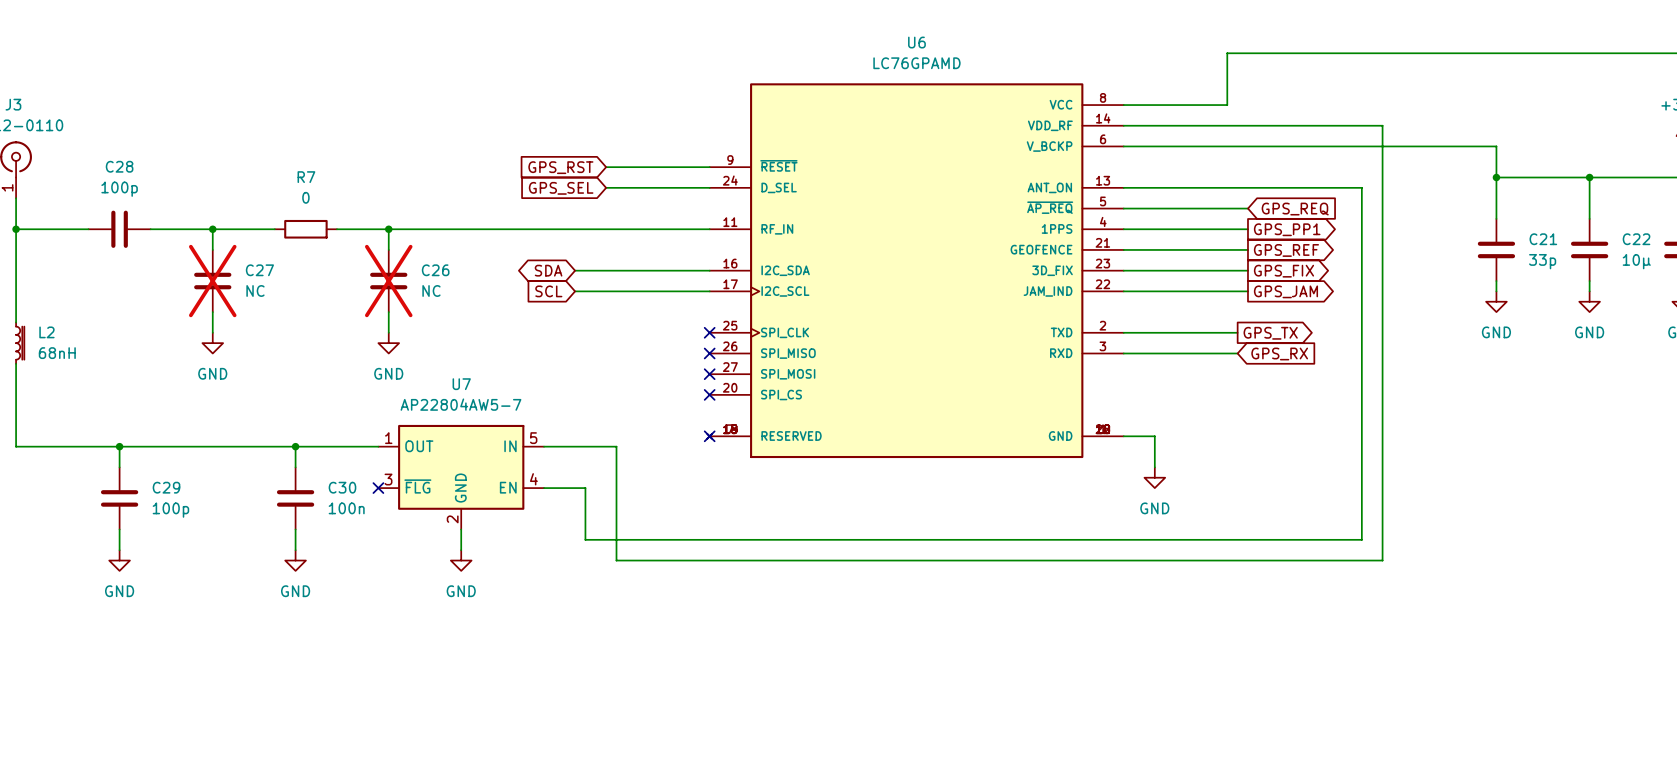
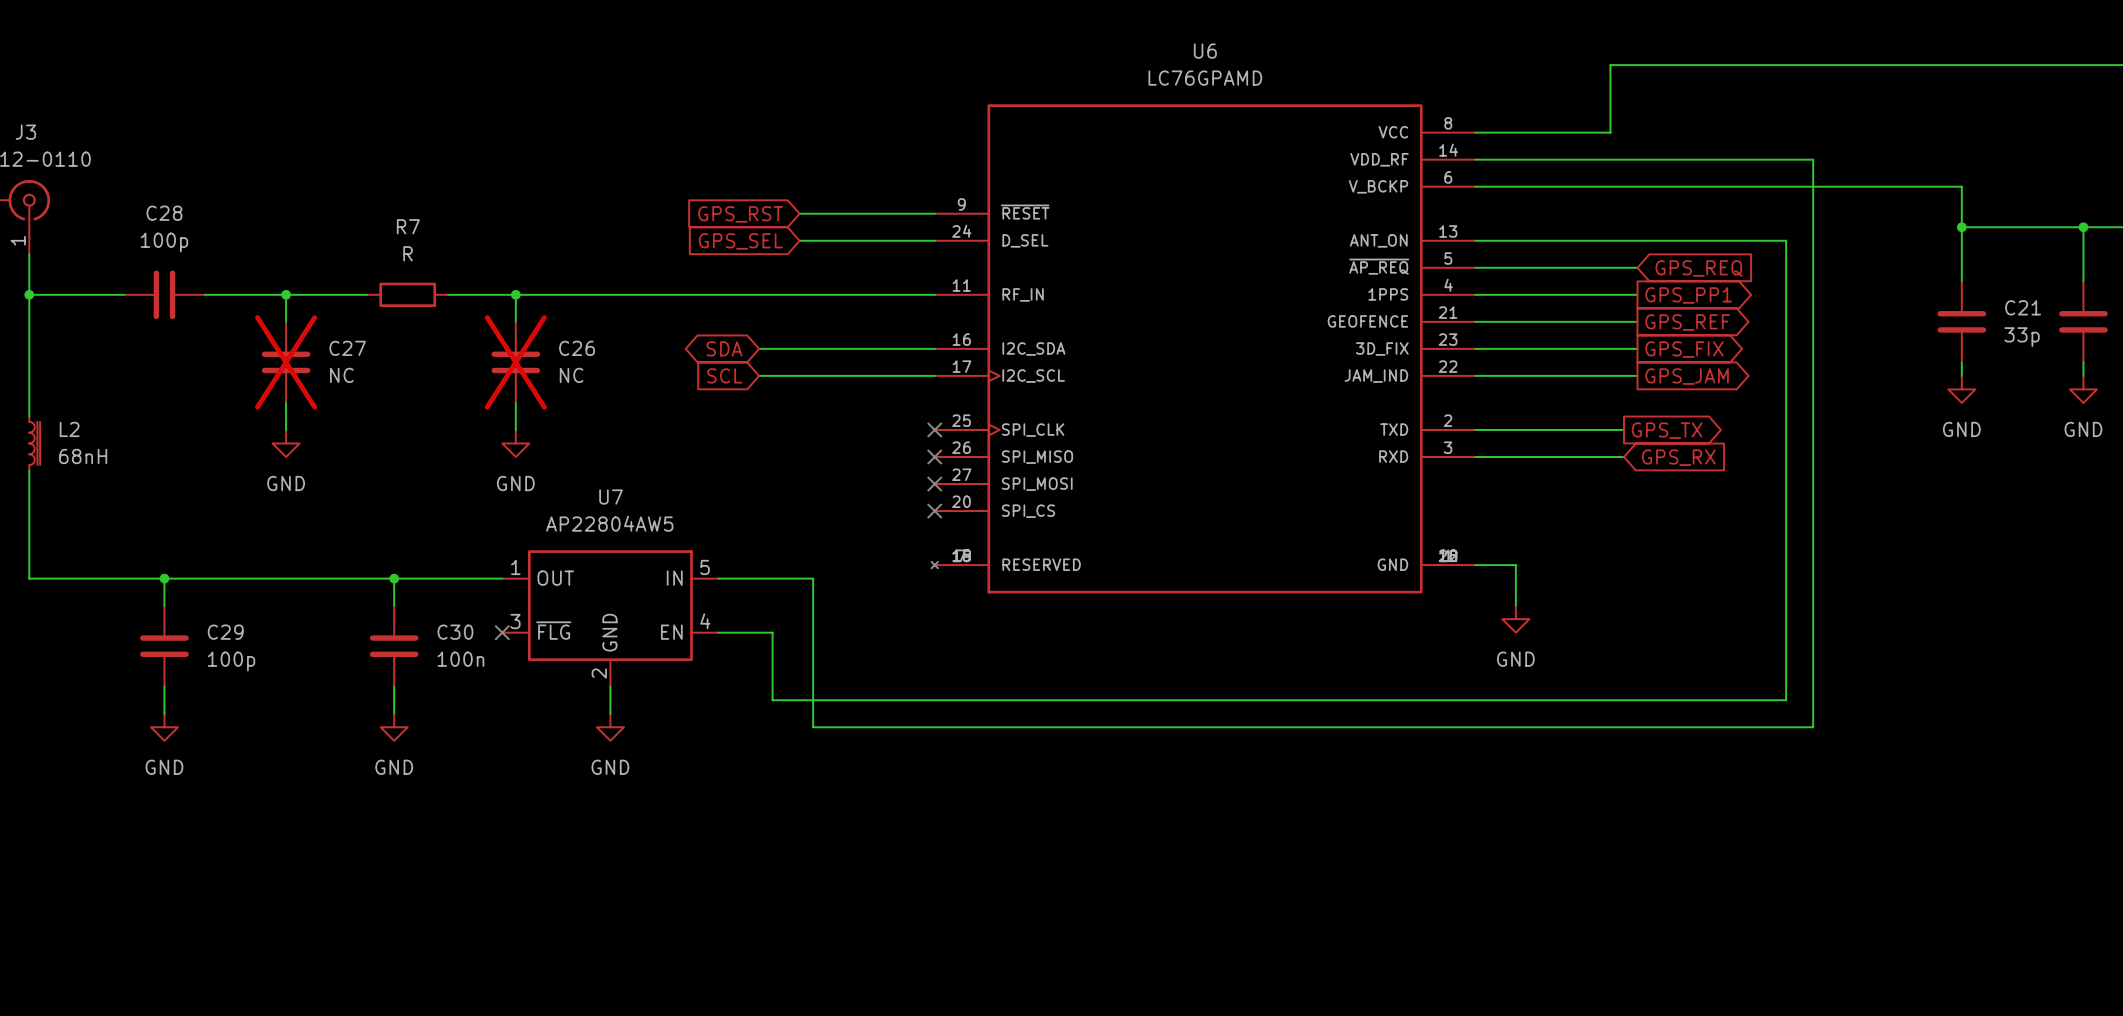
R7 value: 0 (305, 197) -> R (408, 253)
U7 value: AP22804AW5-7 (460, 404) -> AP22804AW5 (609, 523)
no-connect mark: (709, 436) -> none

